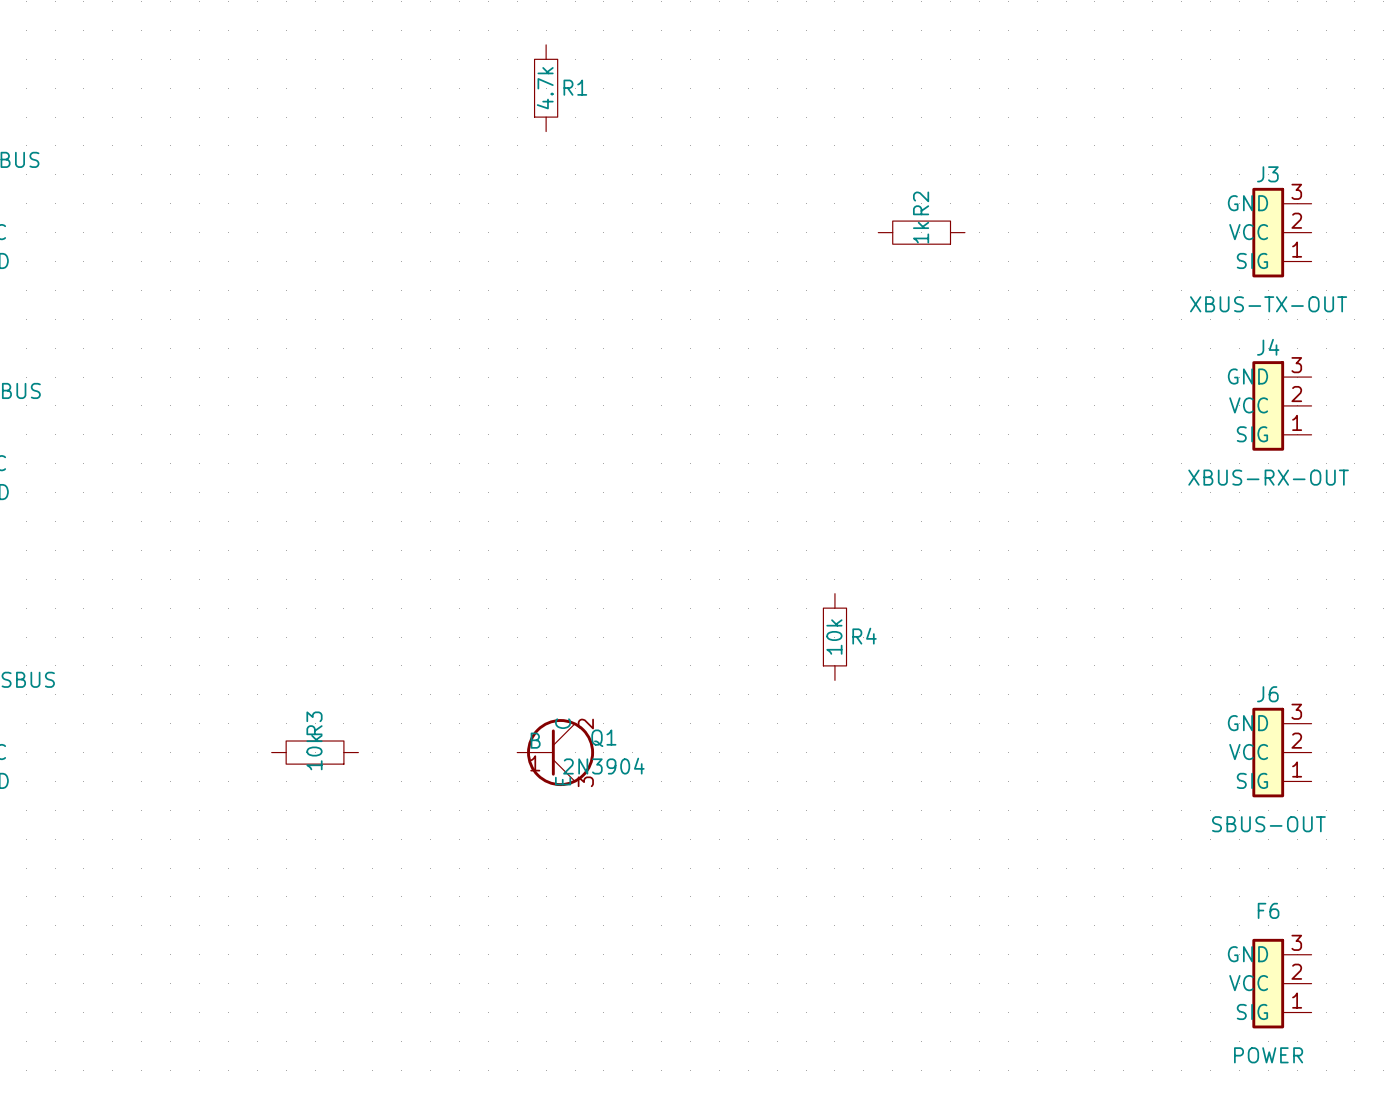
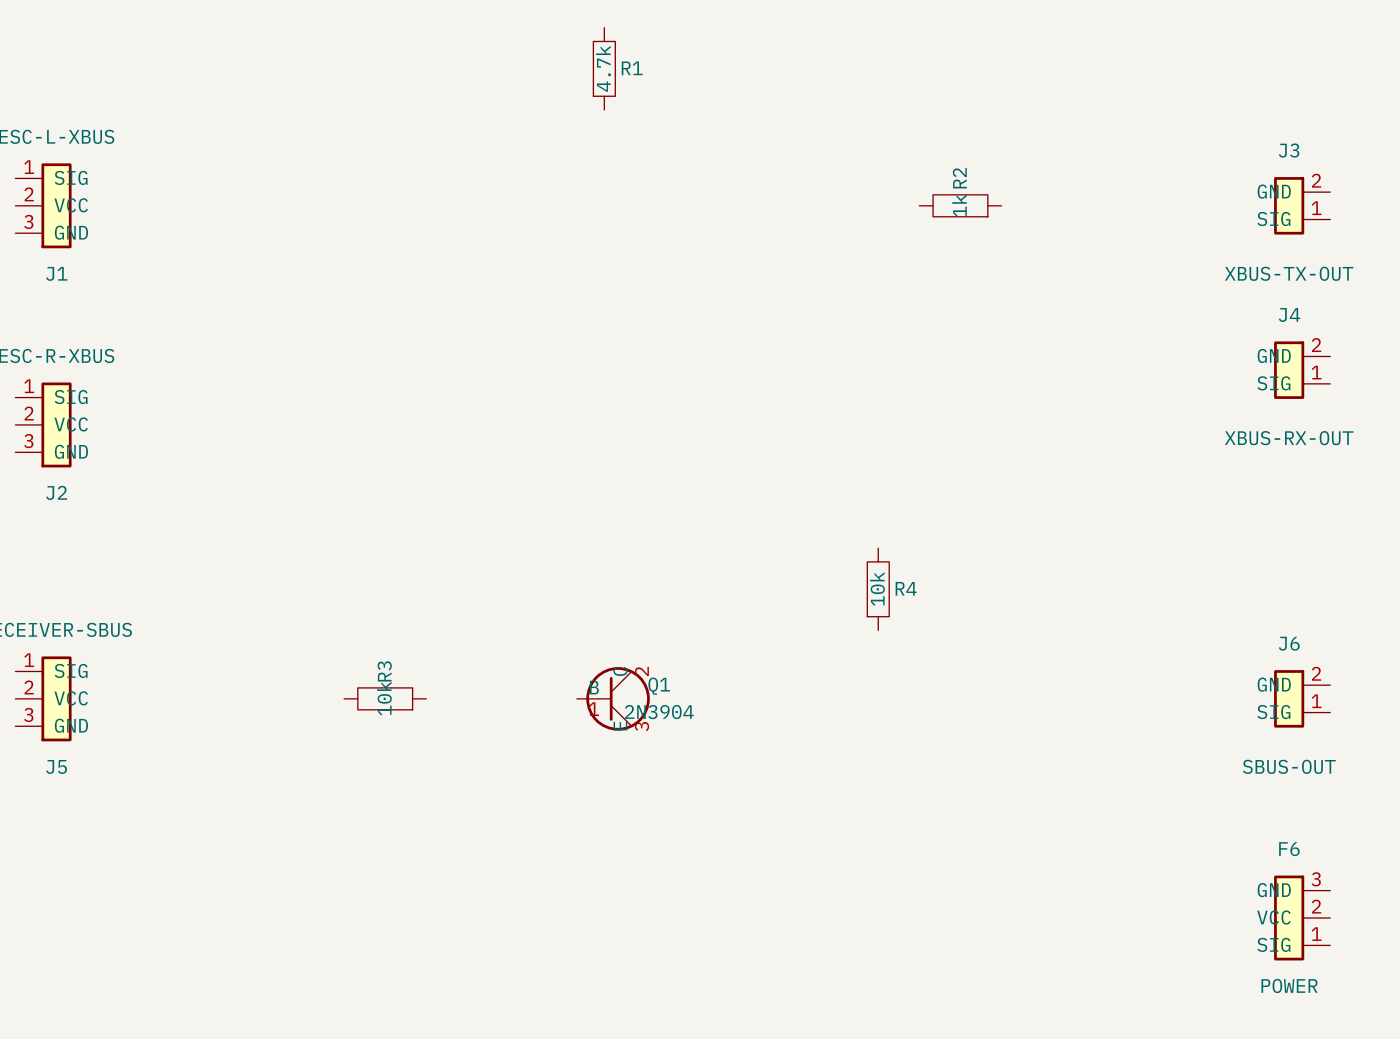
J3 symbol: [1252, 187, 1312, 278] -> [1274, 177, 1331, 235]
J4 symbol: [1252, 361, 1312, 451] -> [1274, 341, 1331, 399]
J6 symbol: [1252, 707, 1312, 798] -> [1274, 670, 1331, 728]

